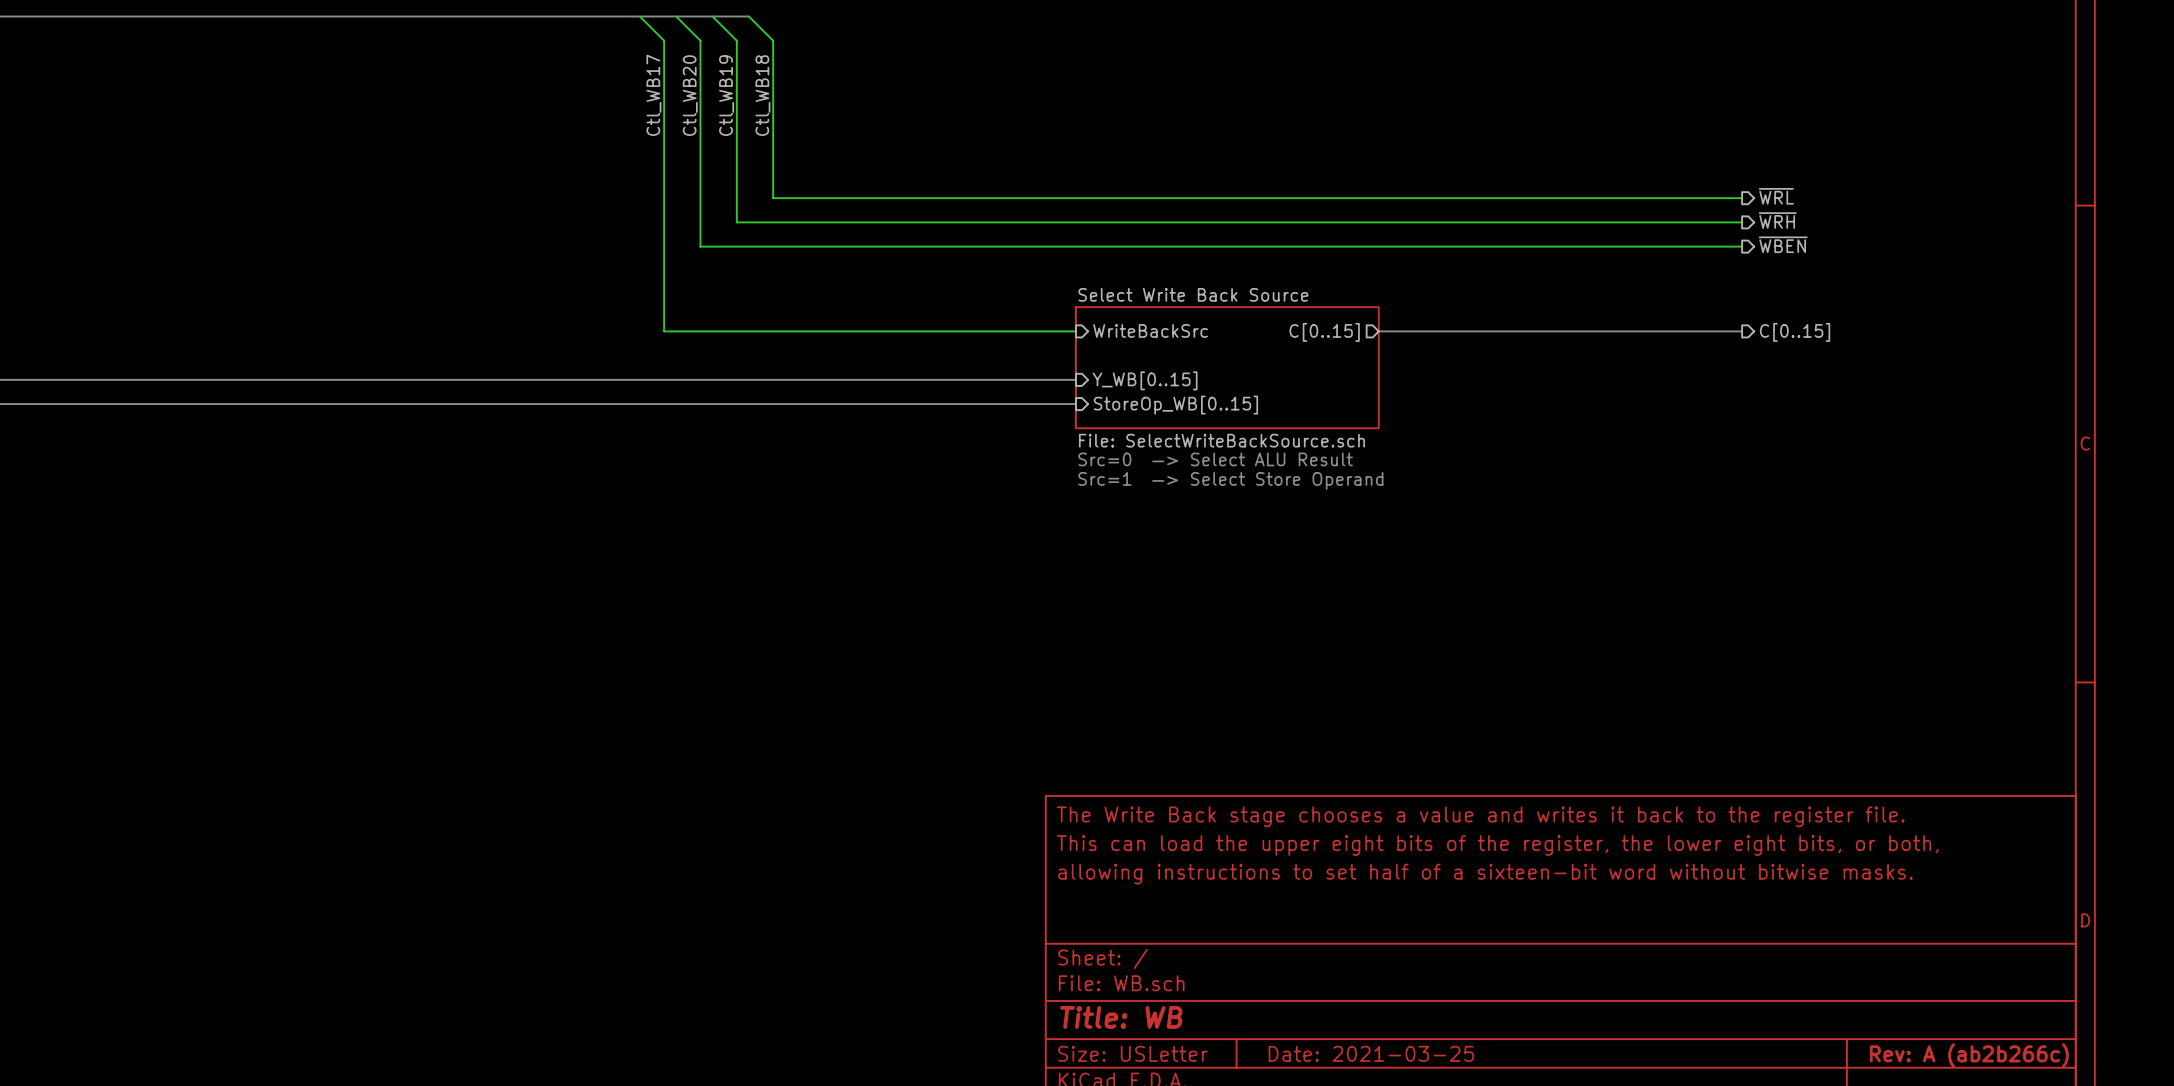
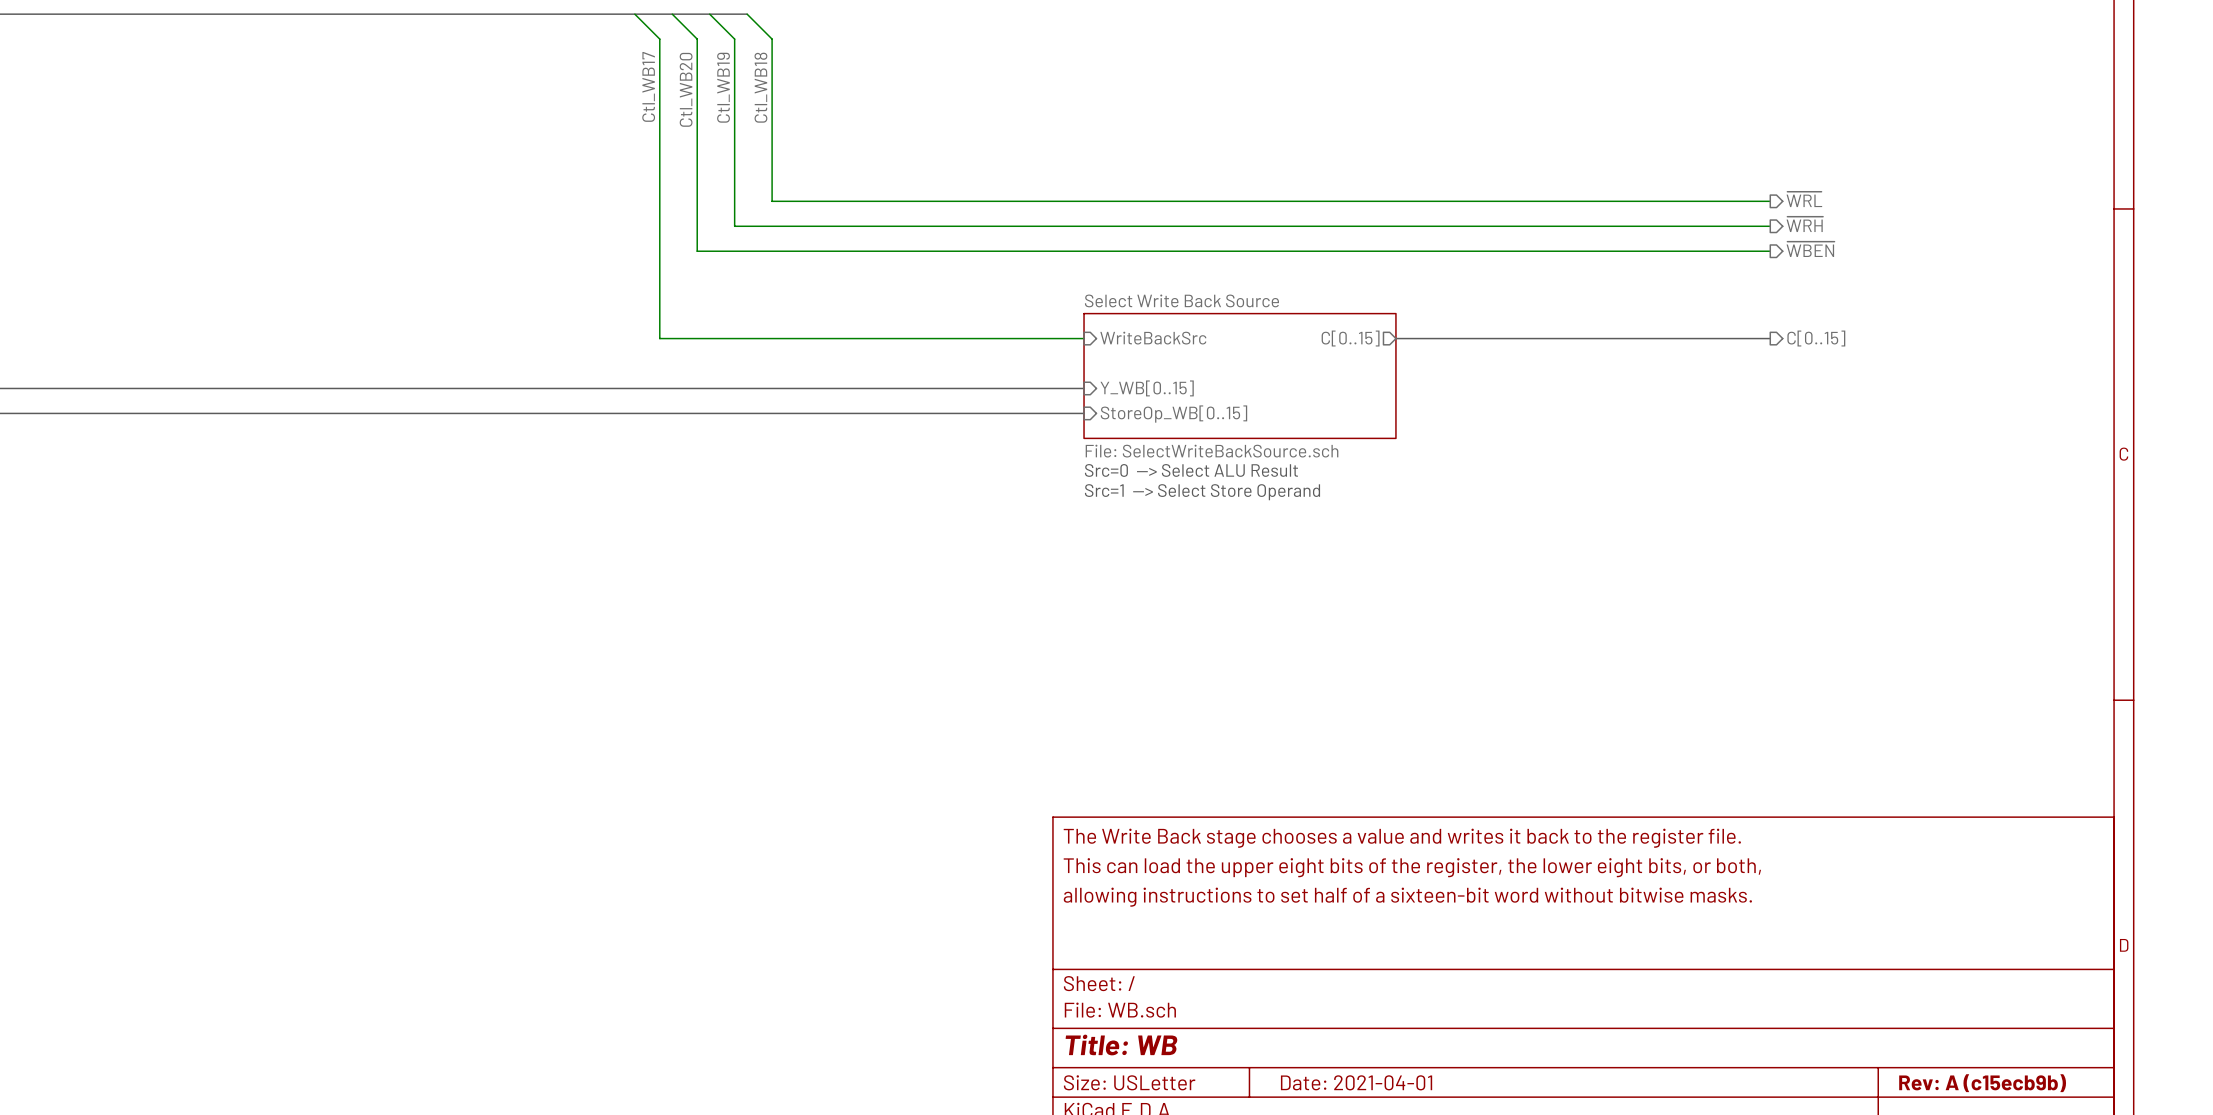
title block: Date: 2021-03-25 (1371, 1053) -> Date: 2021-04-01 (1356, 1082)
title block: Rev: A (ab2b266c) (1969, 1055) -> Rev: A (c15ecb9b) (1982, 1083)

